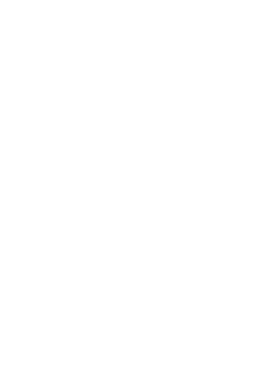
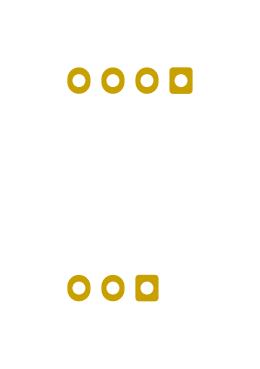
part: none -> (129, 80)
part: none -> (112, 288)

